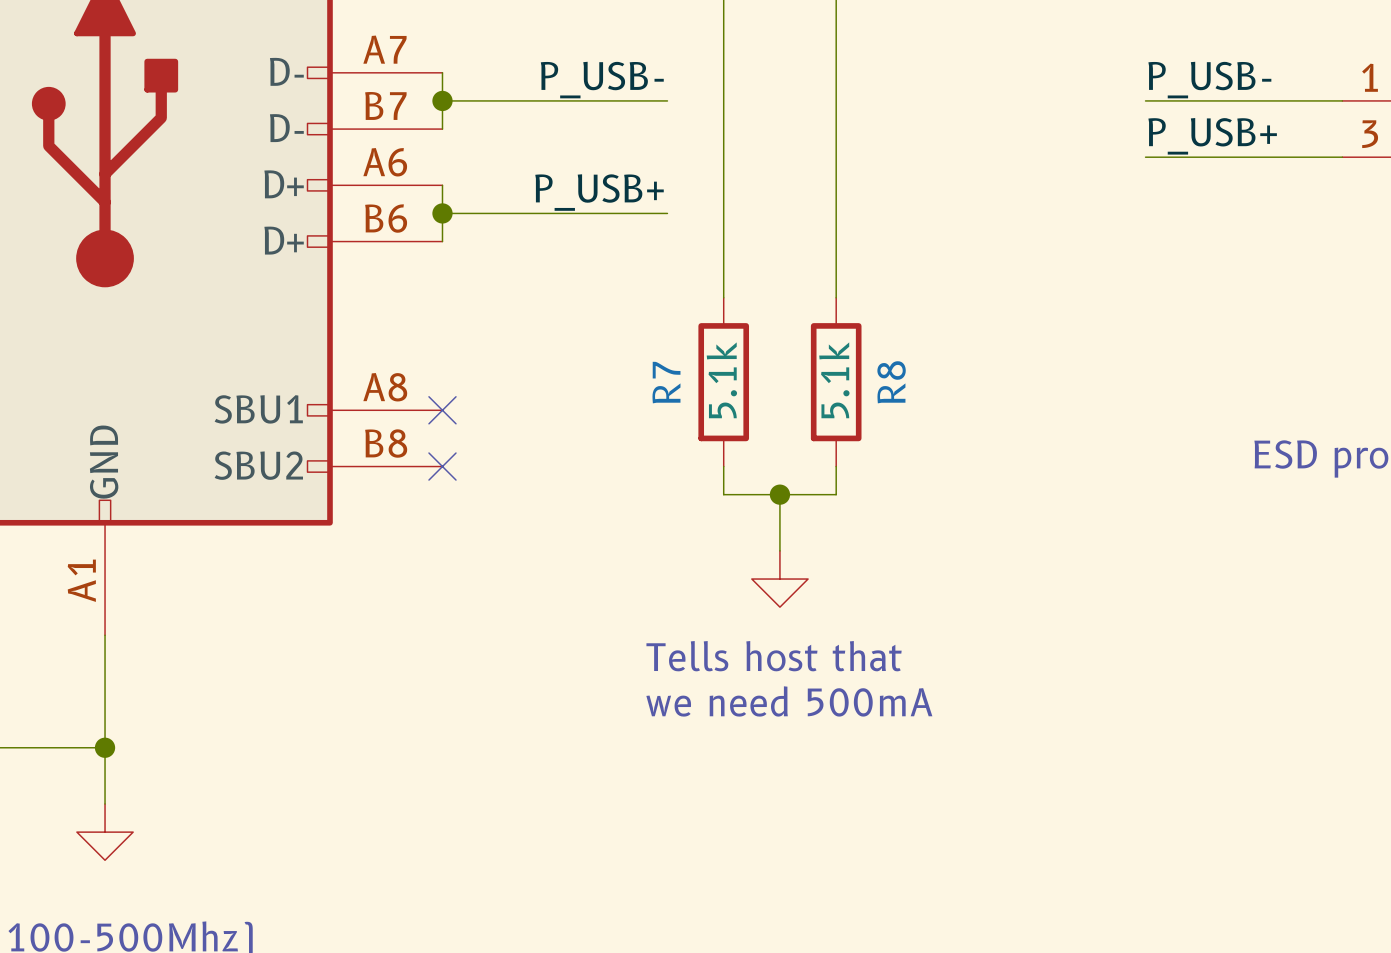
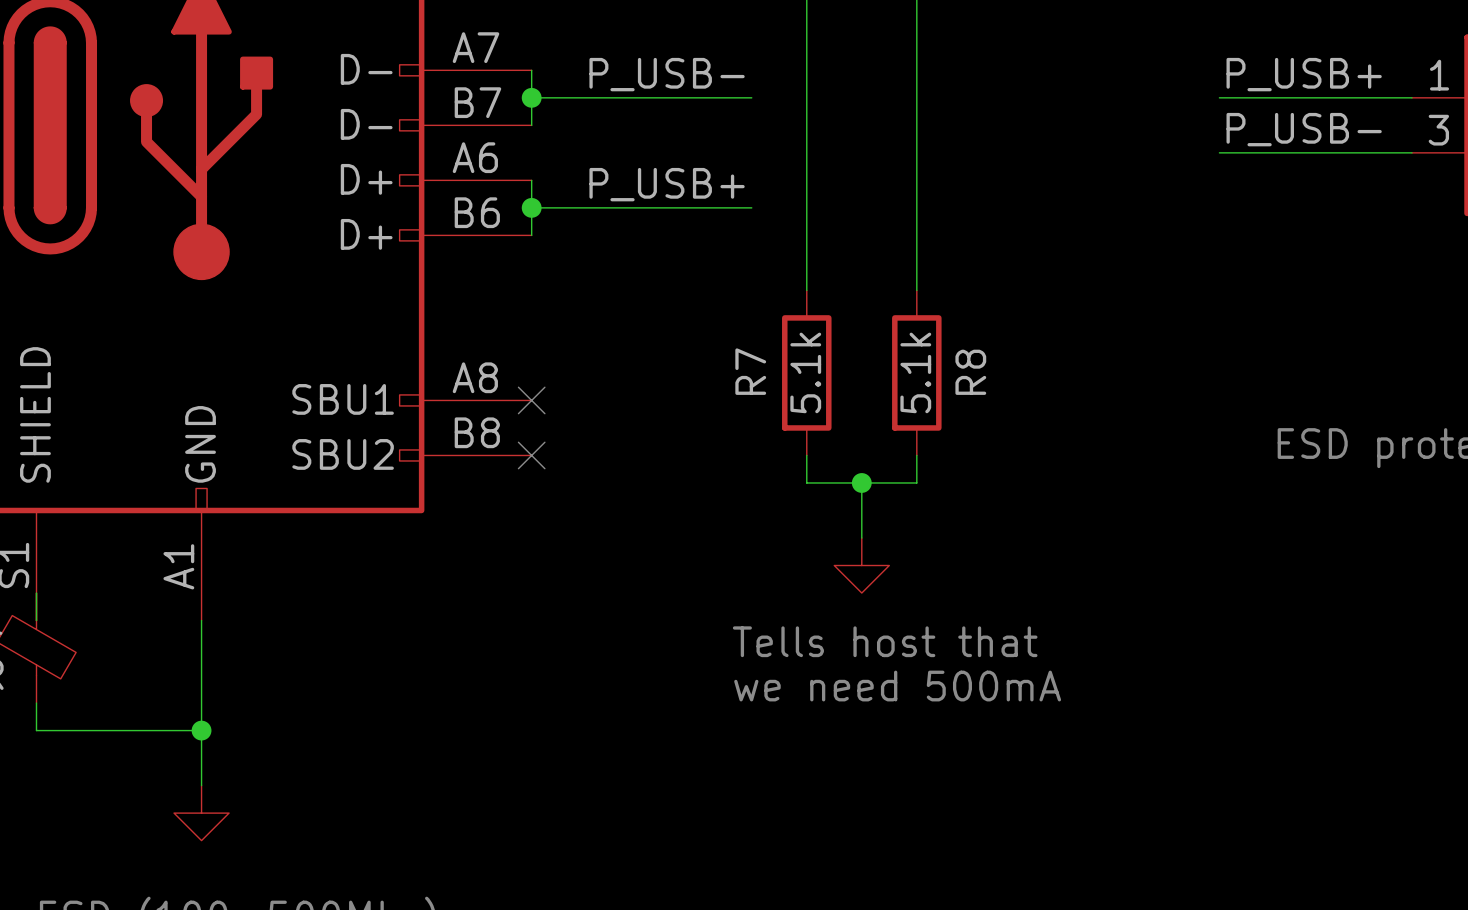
label: P_USB- (1209, 80) -> P_USB+ (1304, 74)
label: P_USB+ (1212, 136) -> P_USB- (1304, 129)

